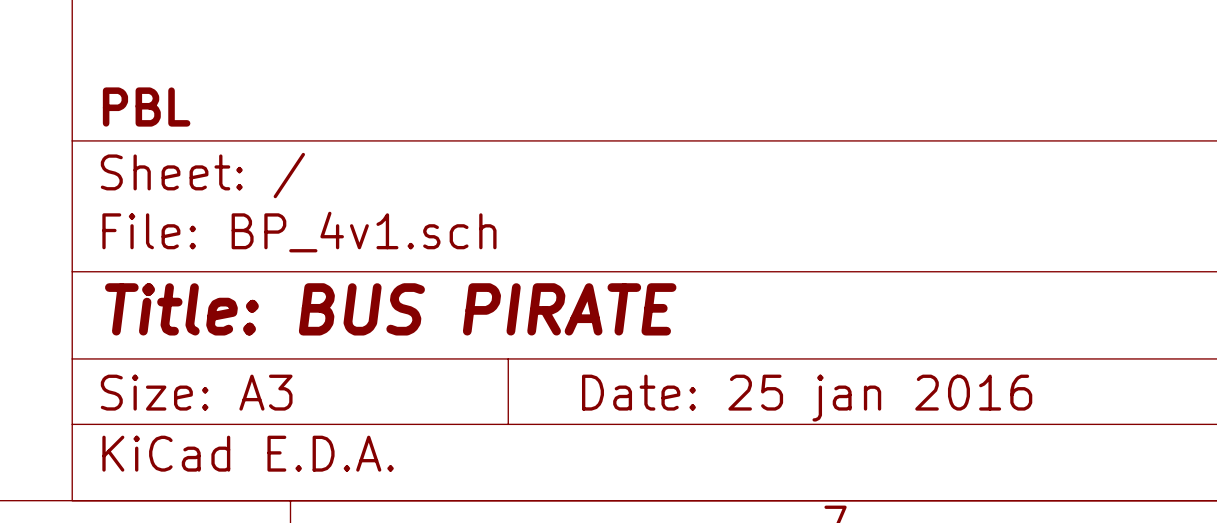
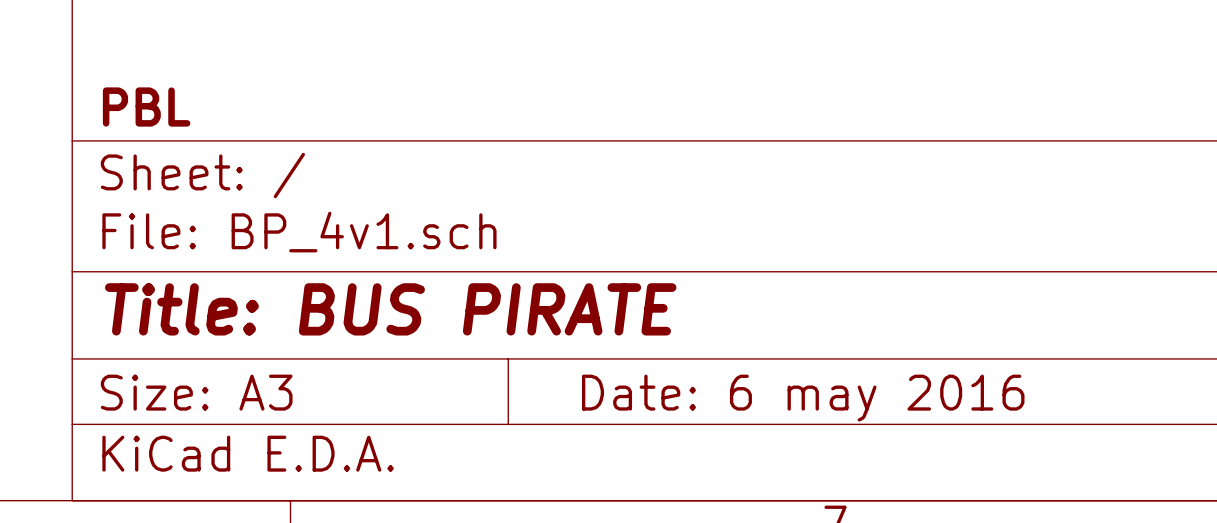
title block: Date: 25 jan 2016 (807, 398) -> Date: 6 may 2016 (803, 398)

